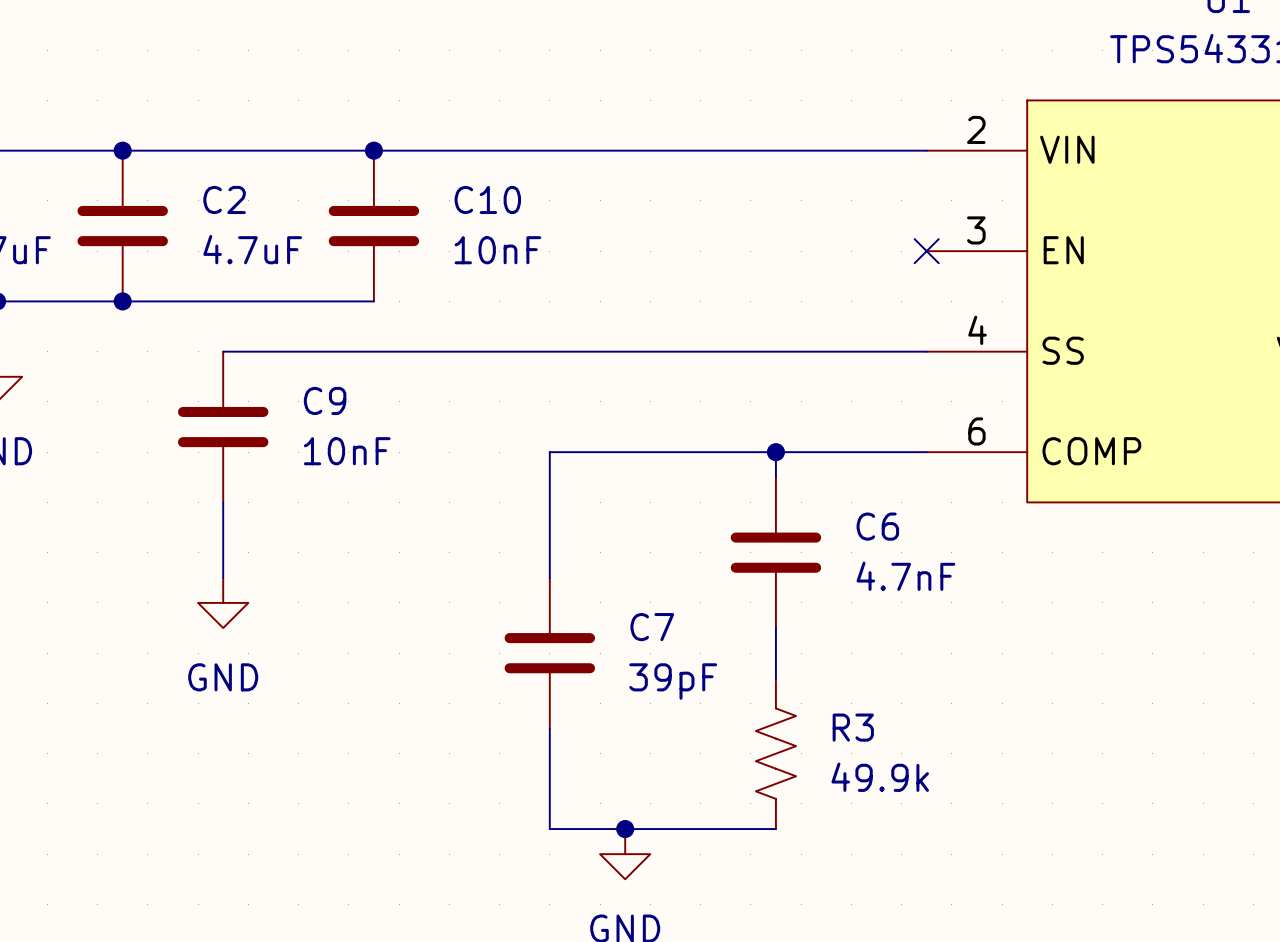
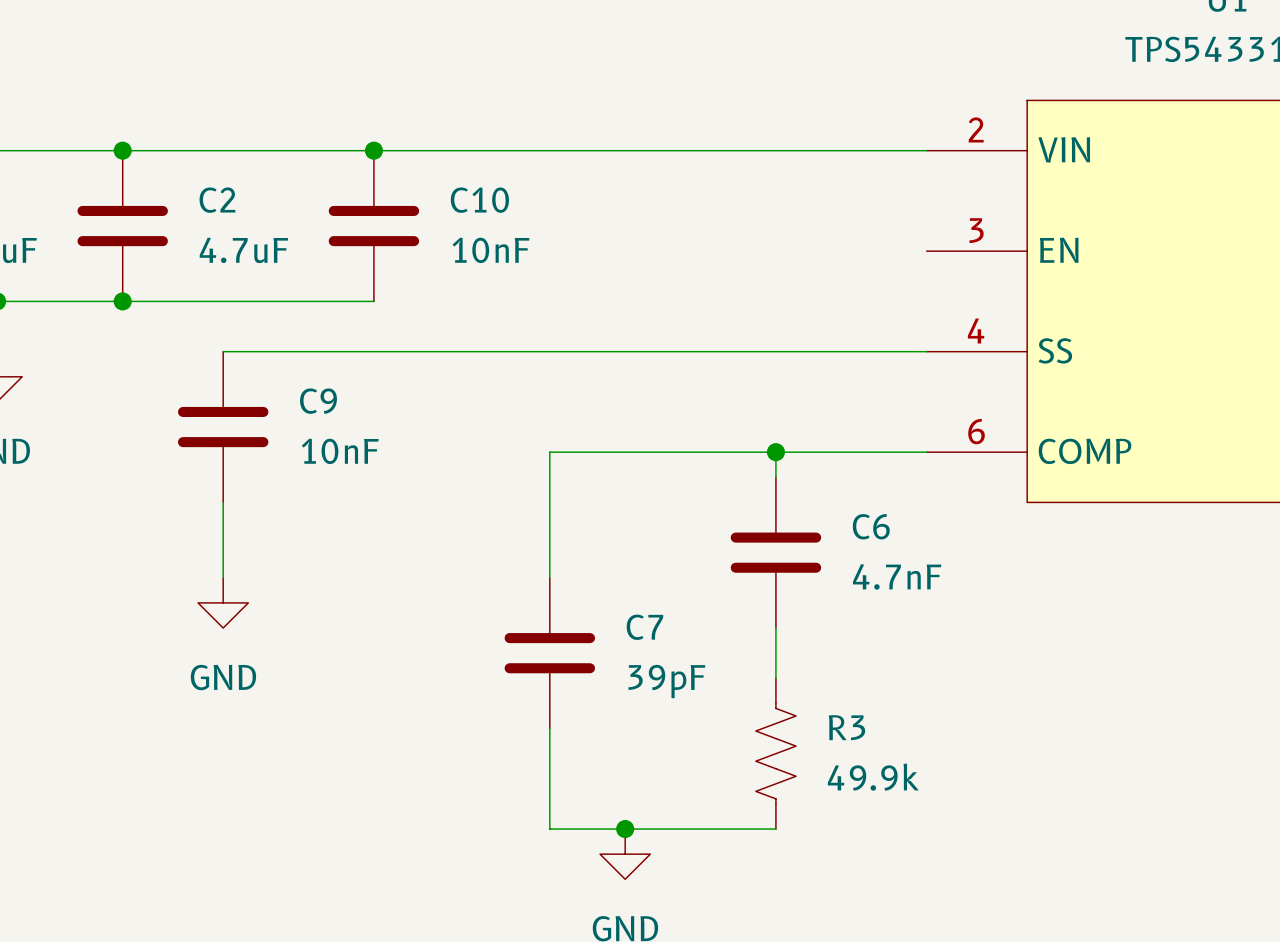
no-connect mark: (926, 251) -> none

